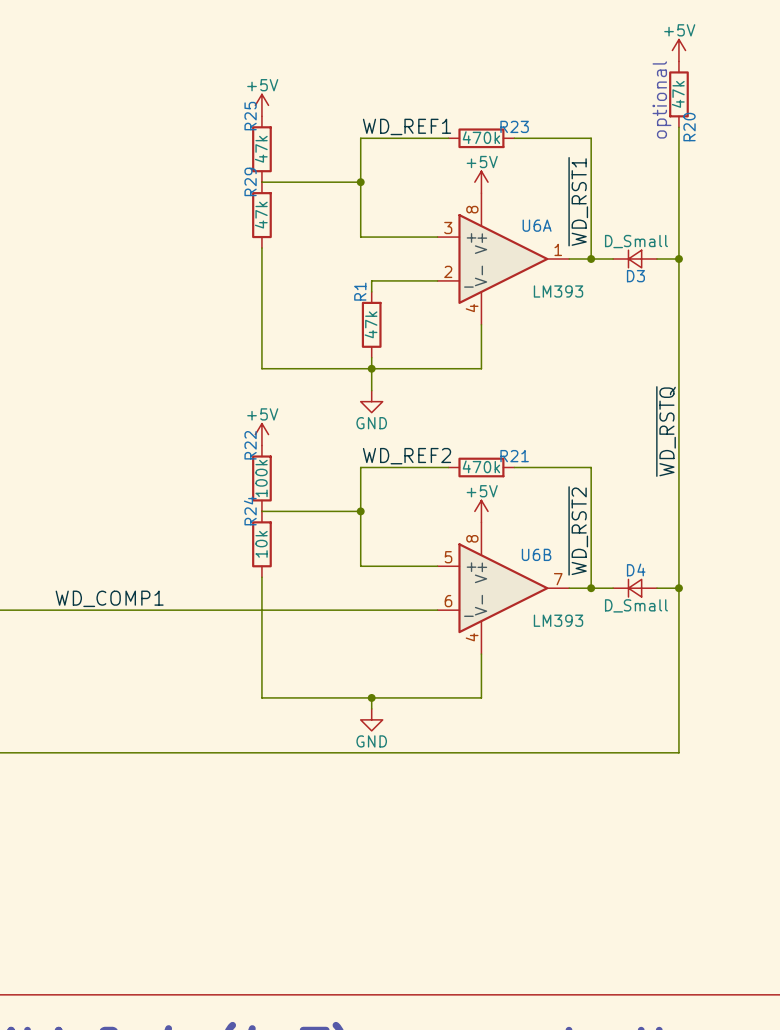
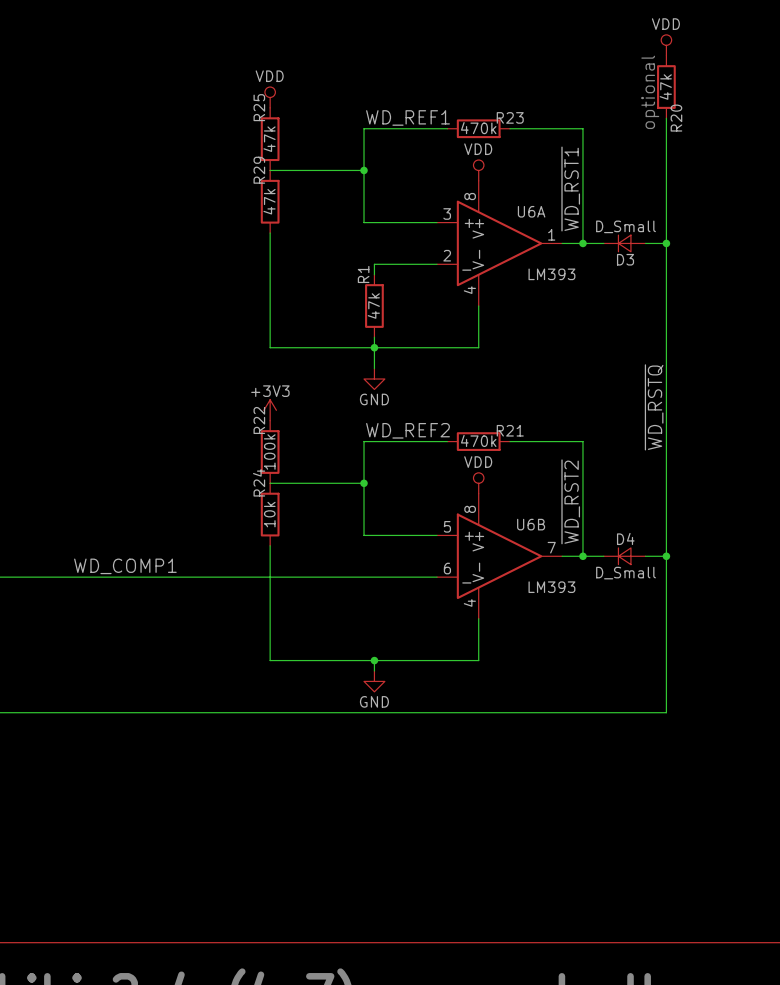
power symbol: +5V (678, 50) -> VDD (666, 45)
power symbol: +5V (261, 105) -> VDD (270, 97)
power symbol: +5V (481, 182) -> VDD (478, 170)
power symbol: +5V (261, 434) -> +3V3 (270, 410)
power symbol: +5V (481, 511) -> VDD (478, 483)

